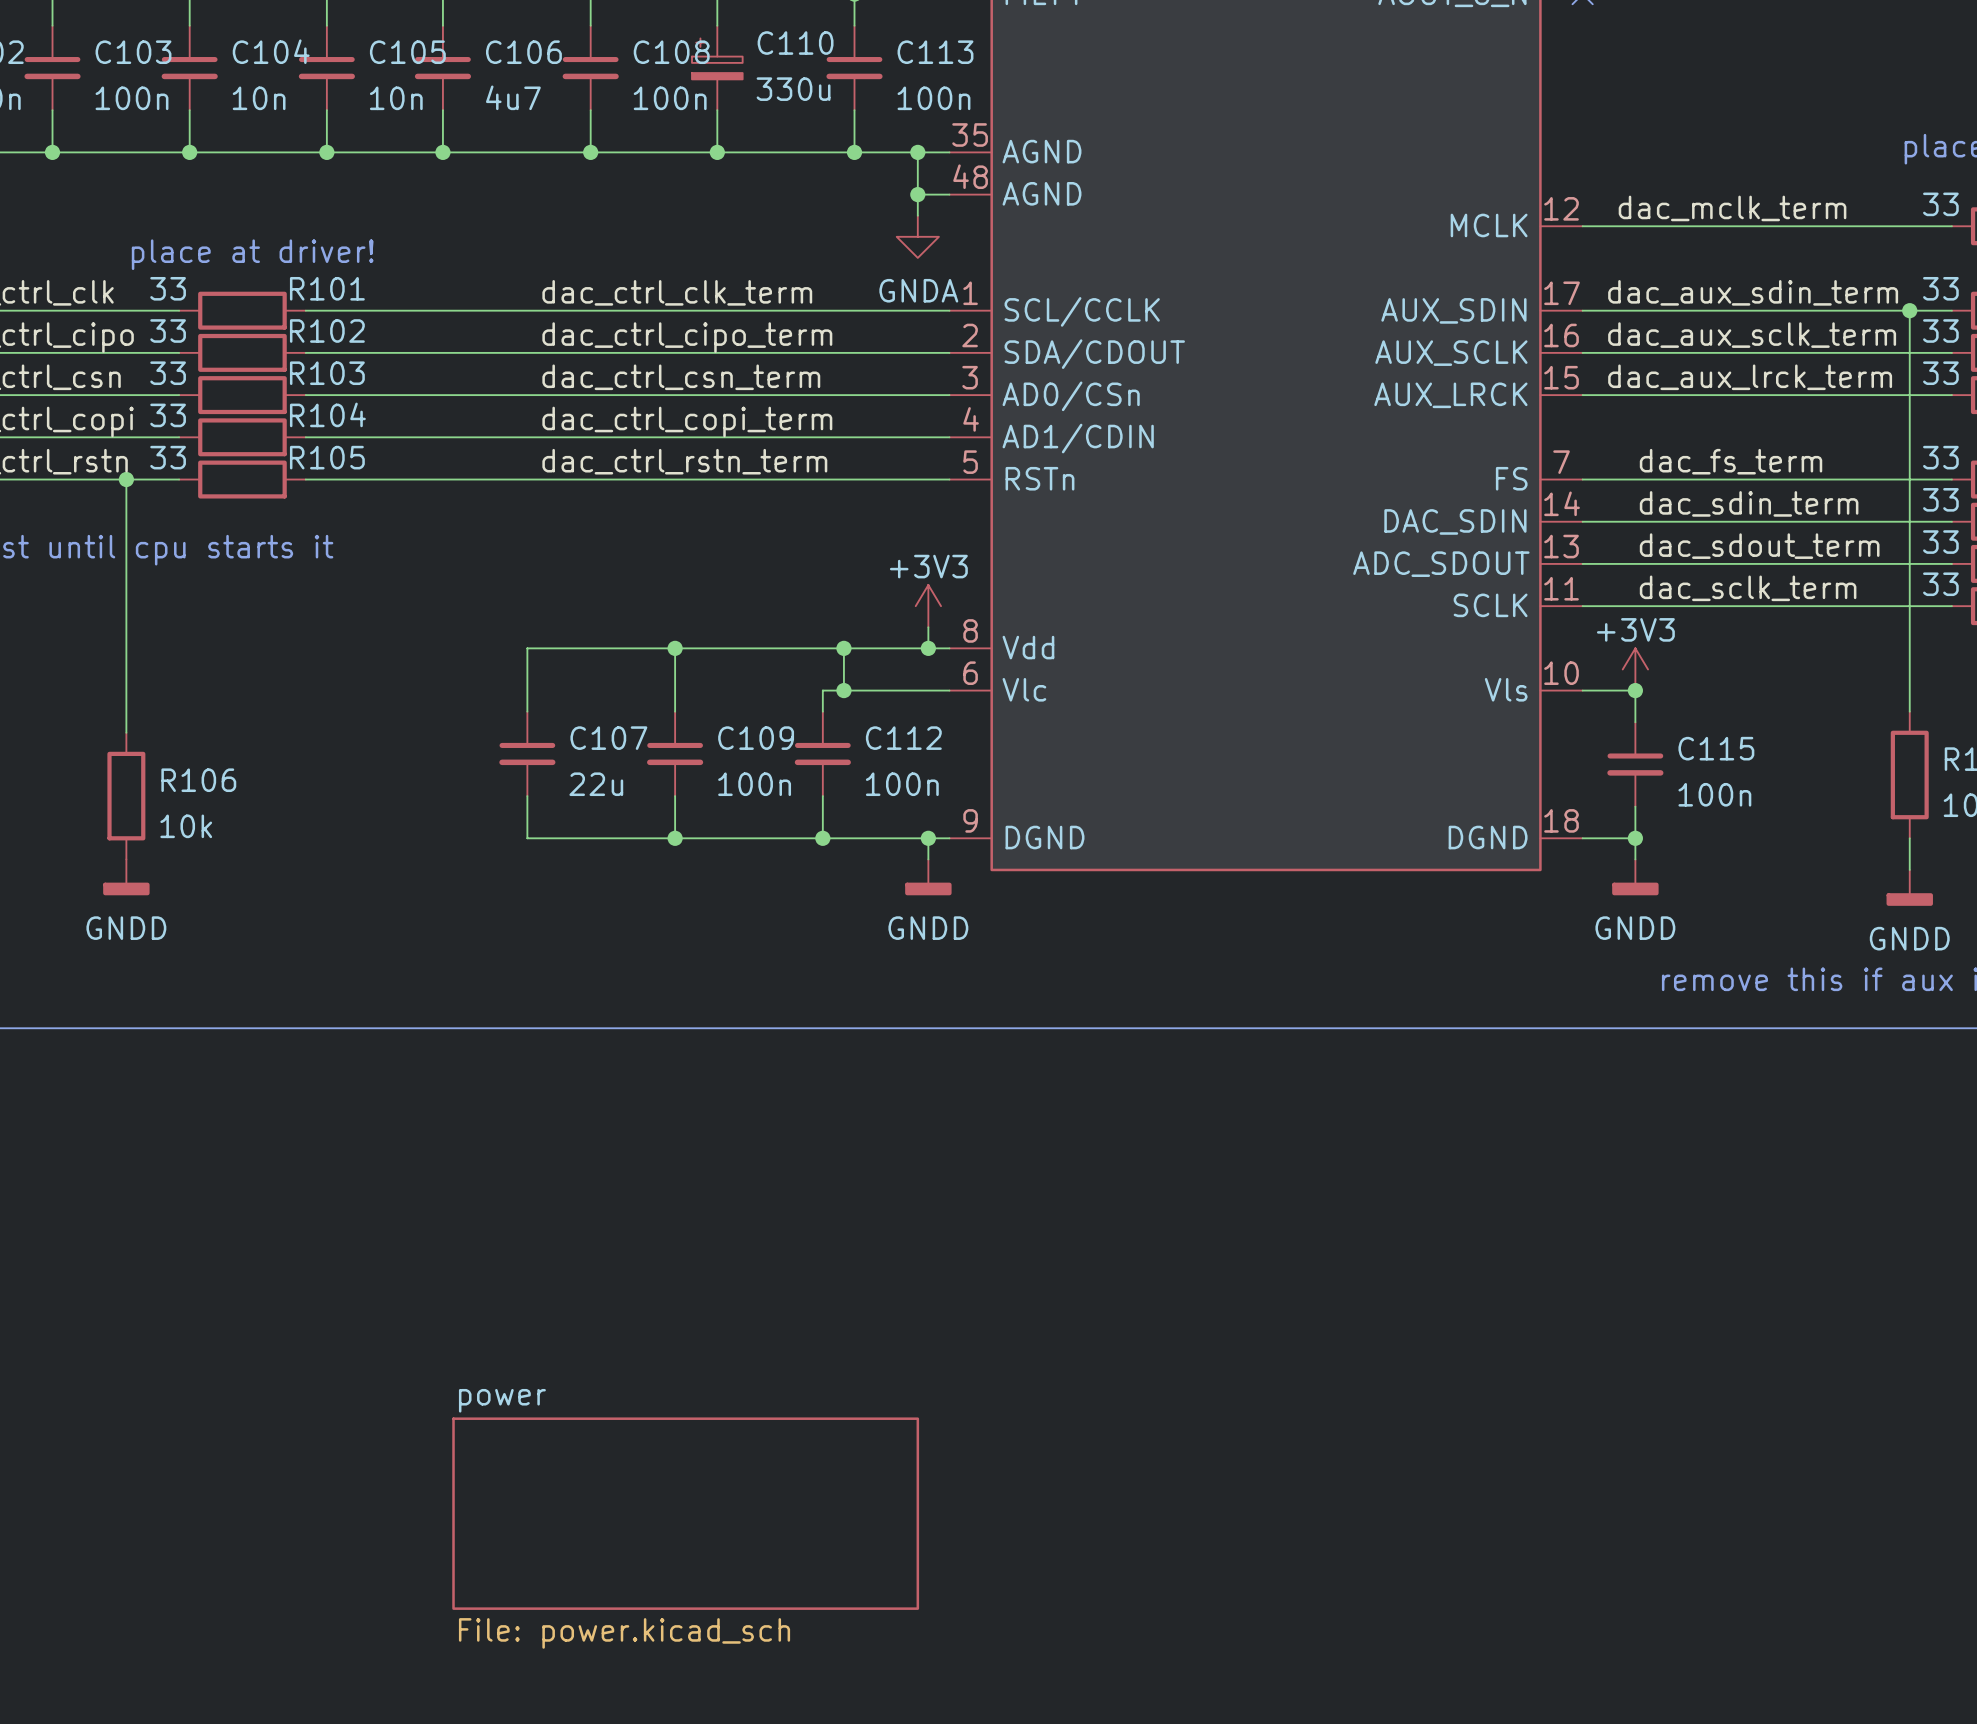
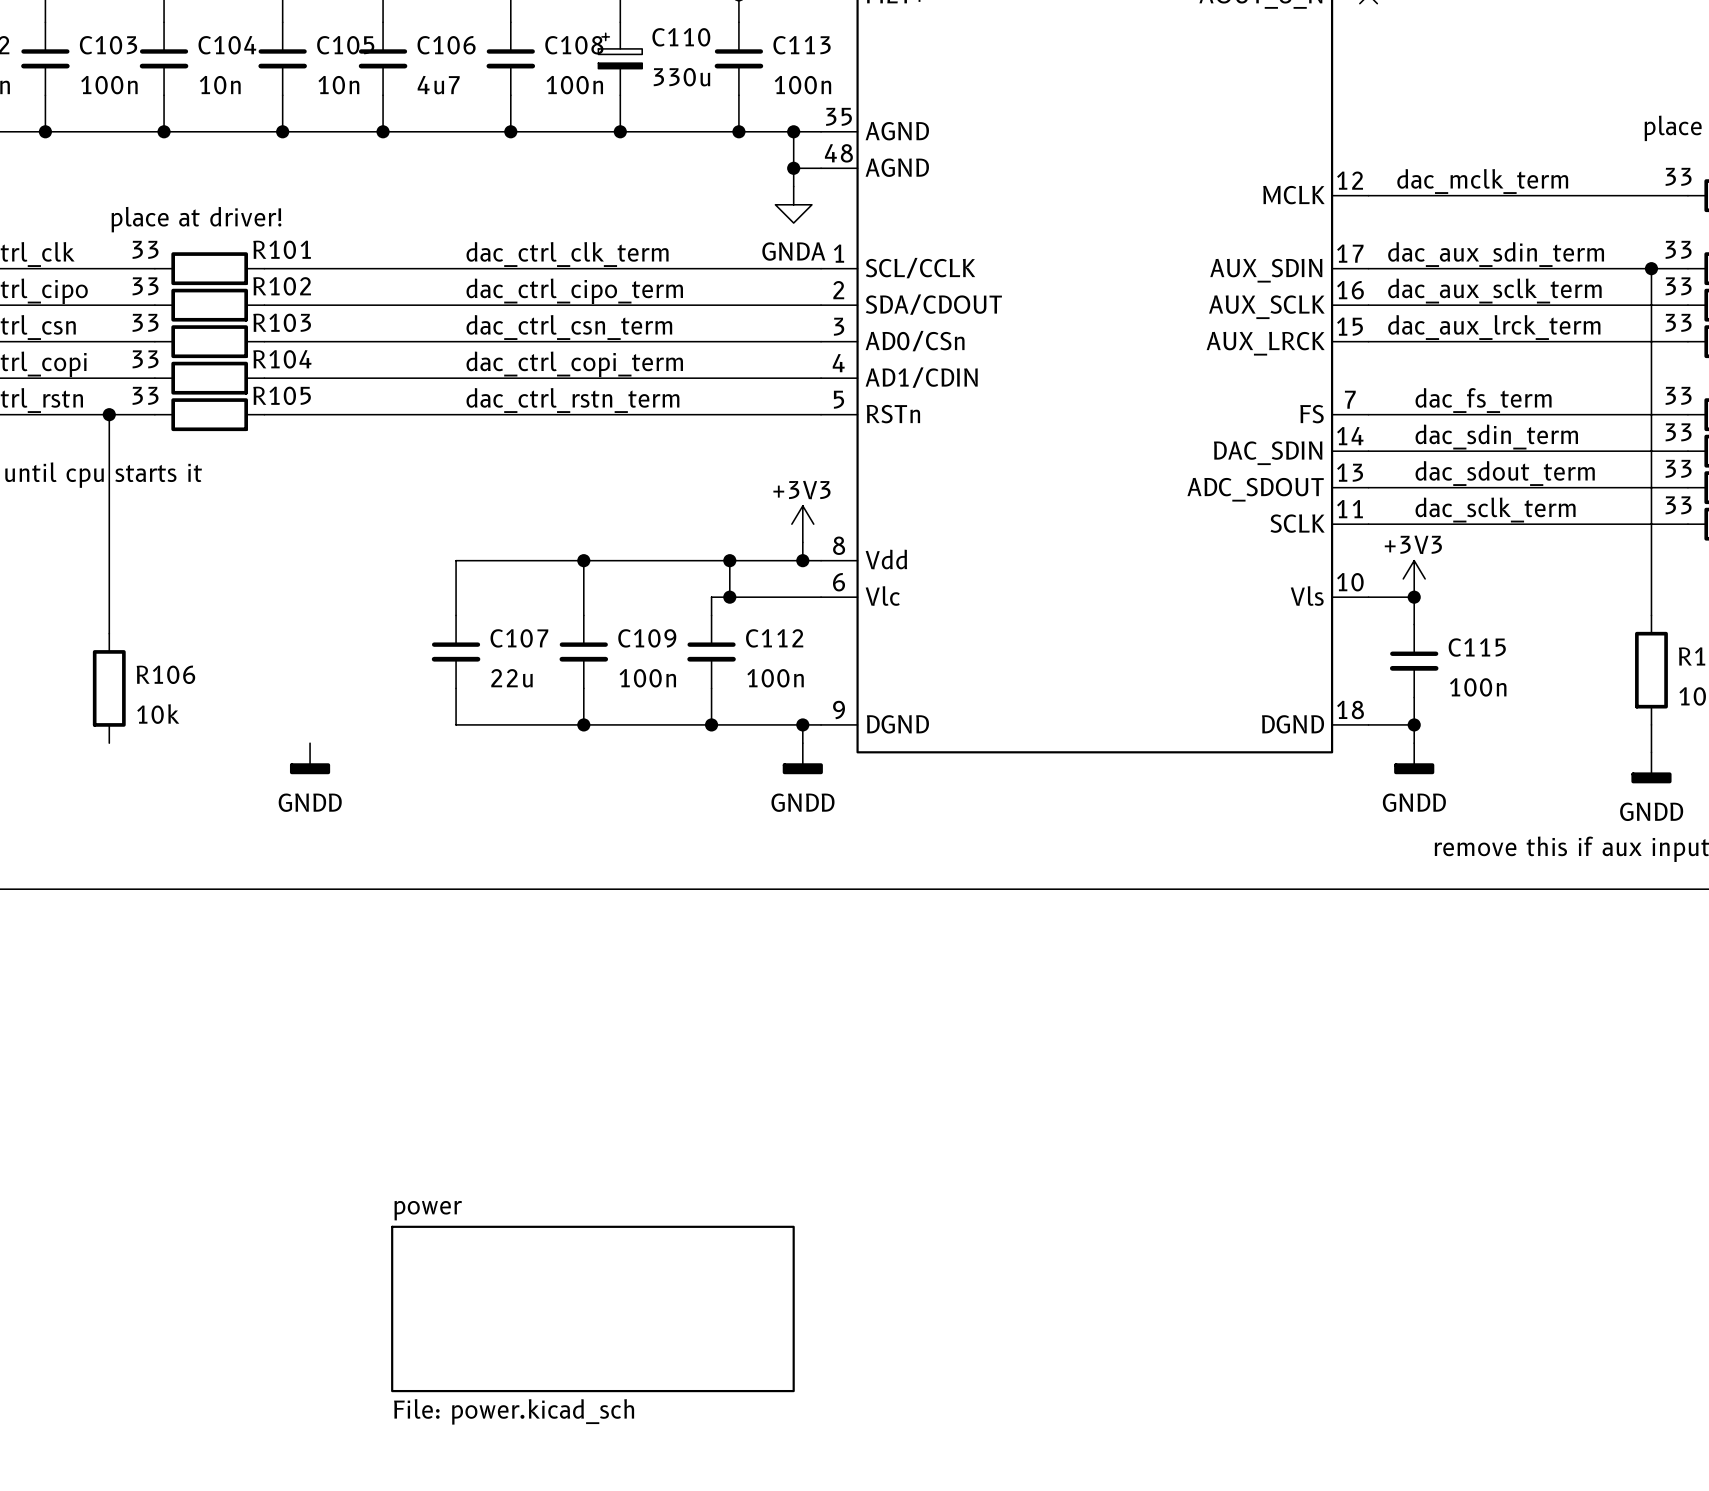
power symbol position: GNDD (126, 877) -> GNDD (310, 758)

